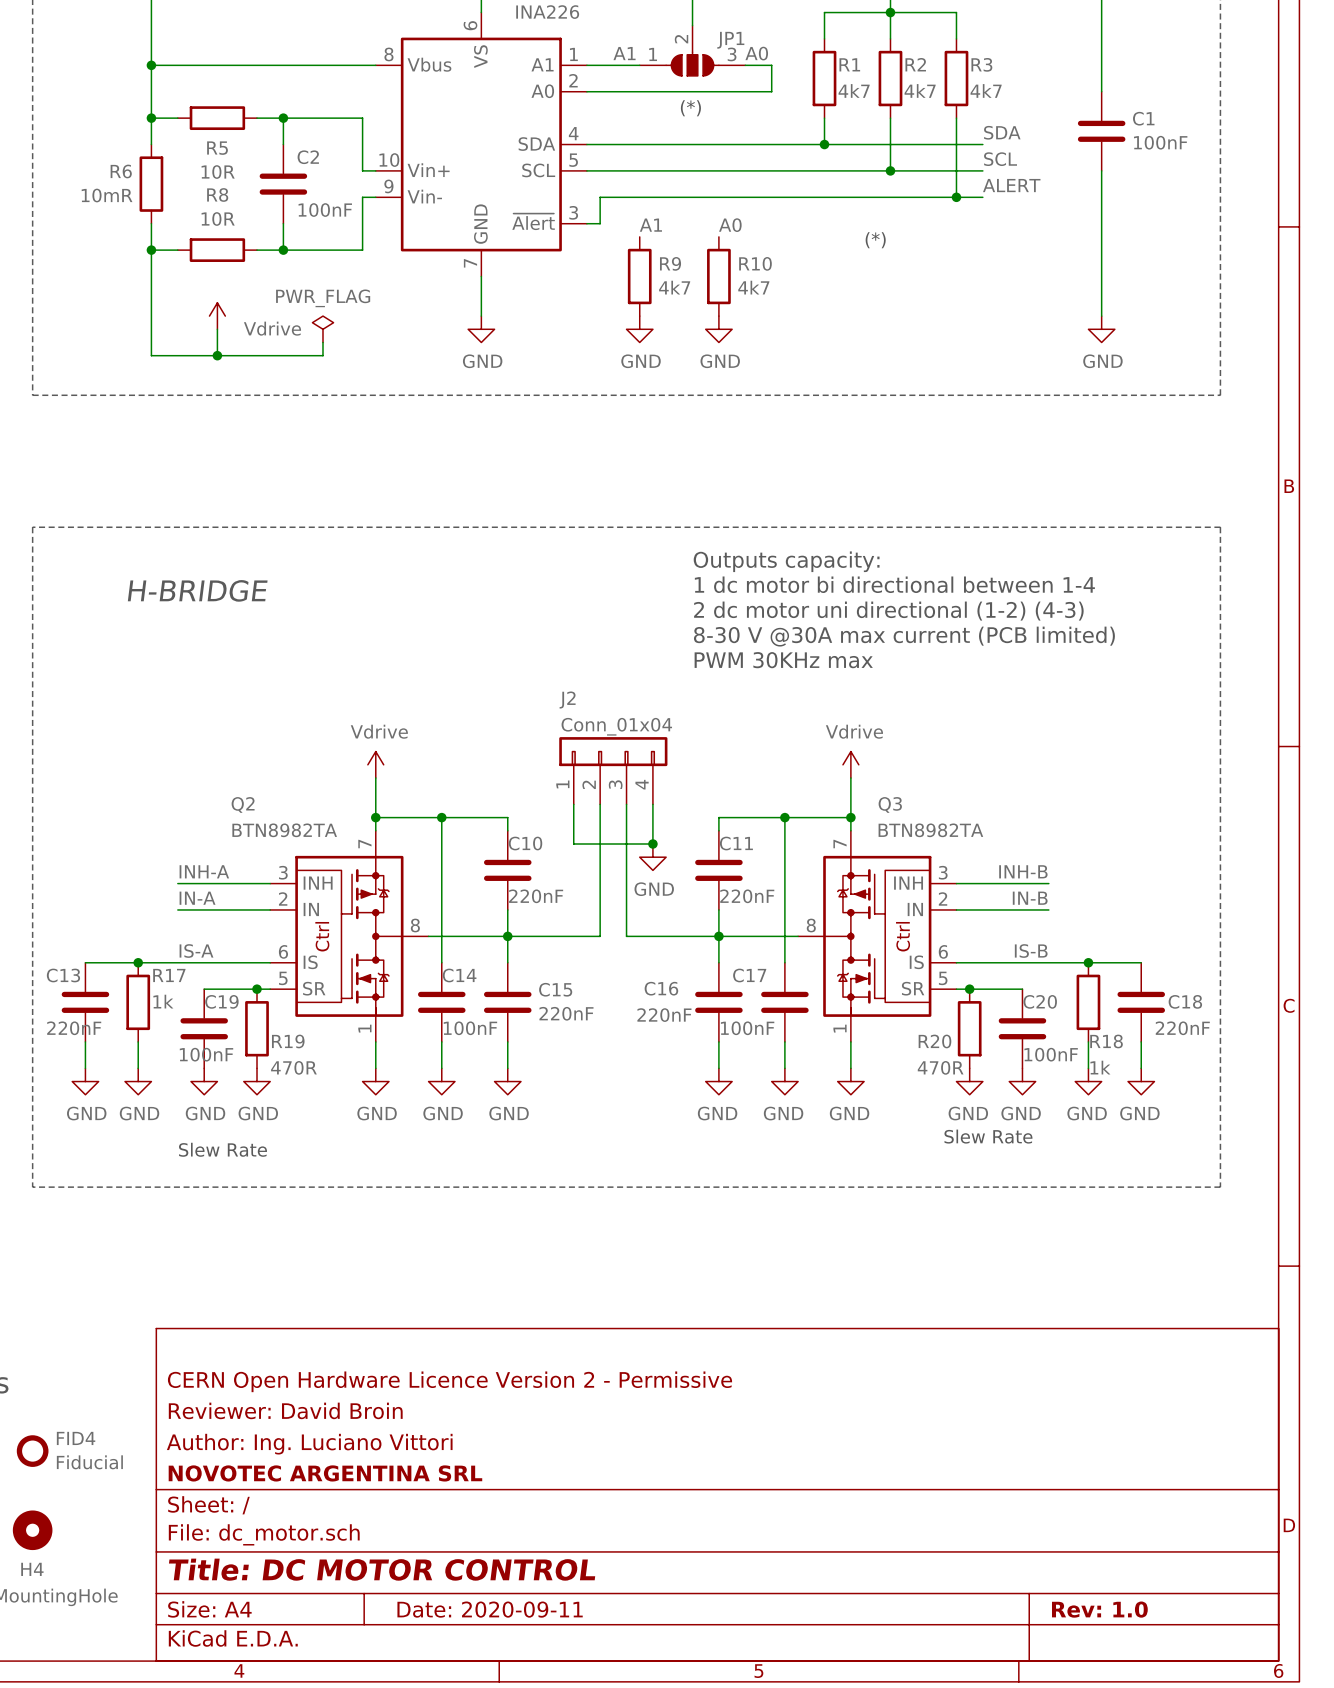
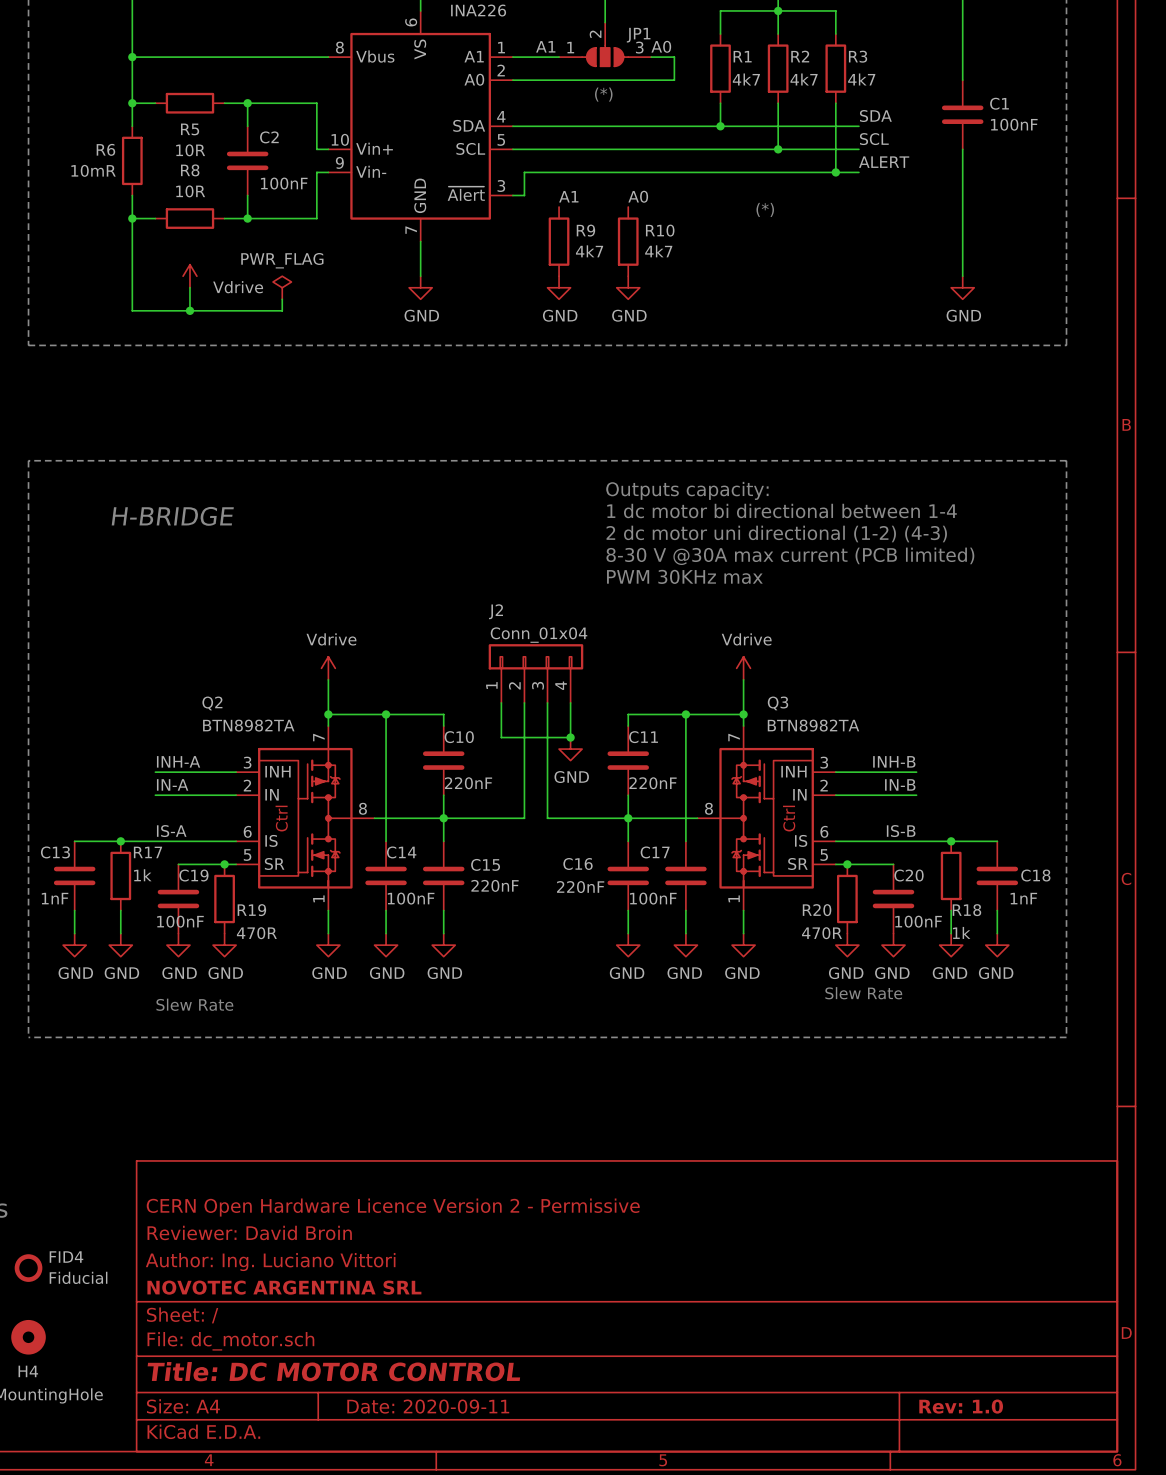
C13 value: 220nF (74, 1028) -> 1nF (55, 898)
C18 value: 220nF (1182, 1028) -> 1nF (1023, 898)

